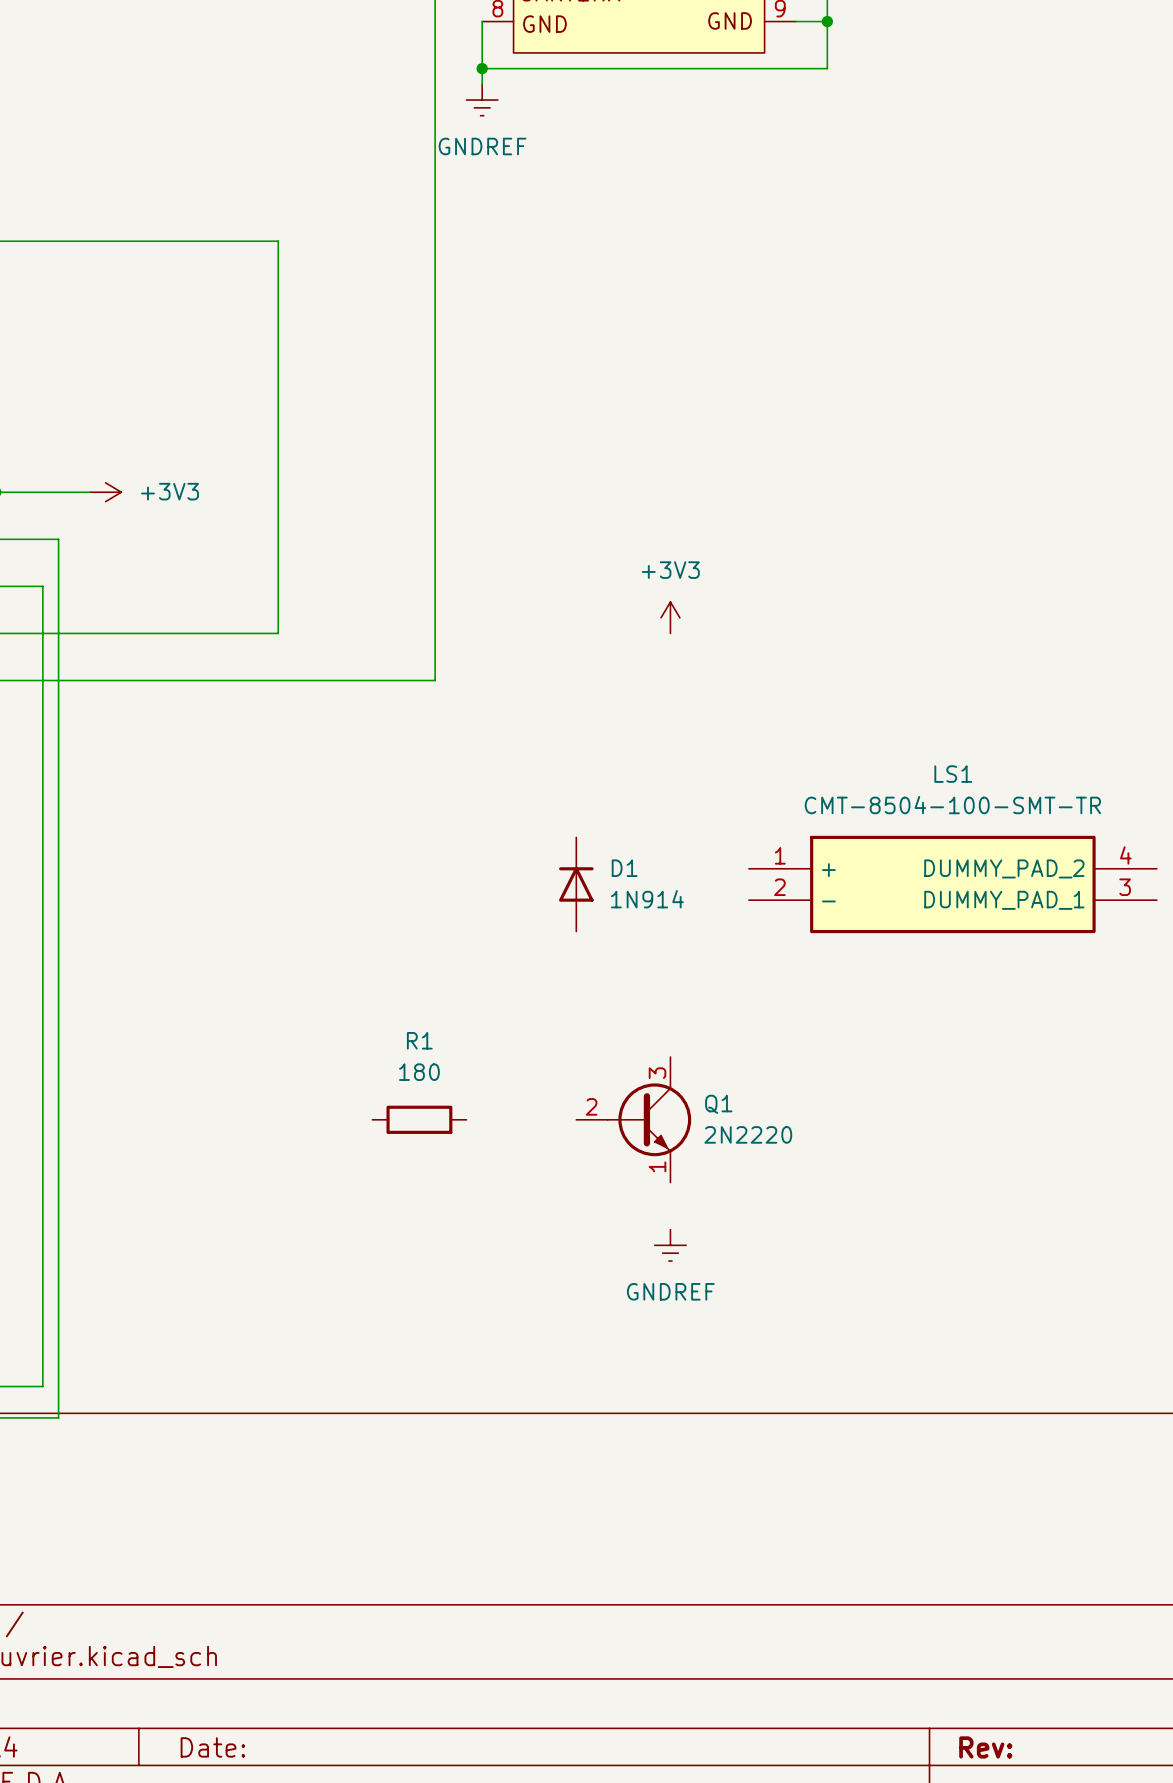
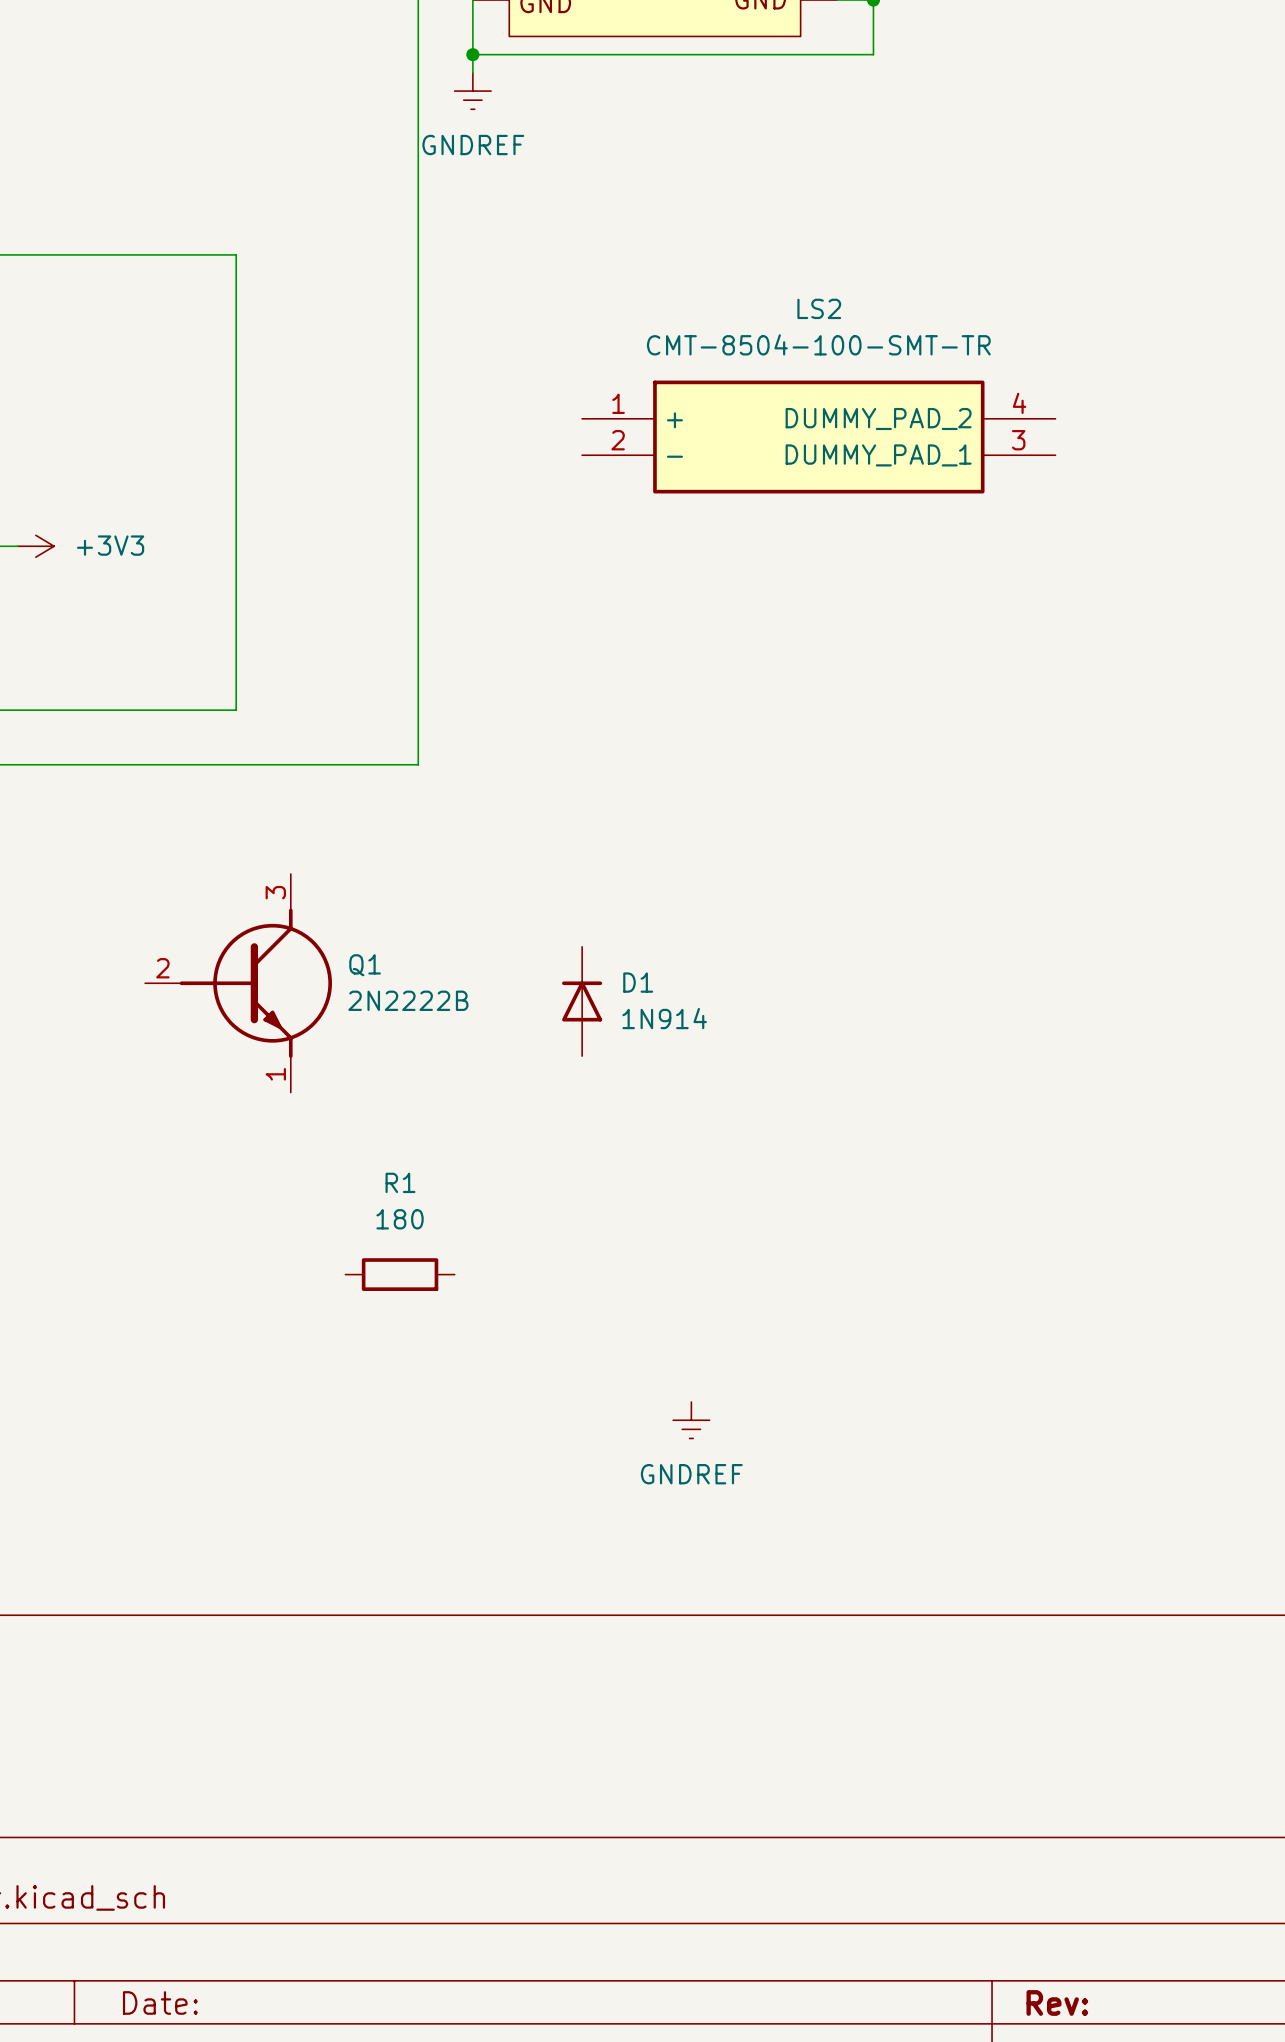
LS2: none -> CMT-8504-100-SMT-TR (818, 437)
power symbol: +3V3 (670, 617) -> none
LS1: CMT-8504-100-SMT-TR (952, 884) -> none
Q1 symbol: [576, 1057, 692, 1183] -> [145, 874, 332, 1093]
Q1 value: 2N2220 (748, 1134) -> 2N2222B (408, 1000)

